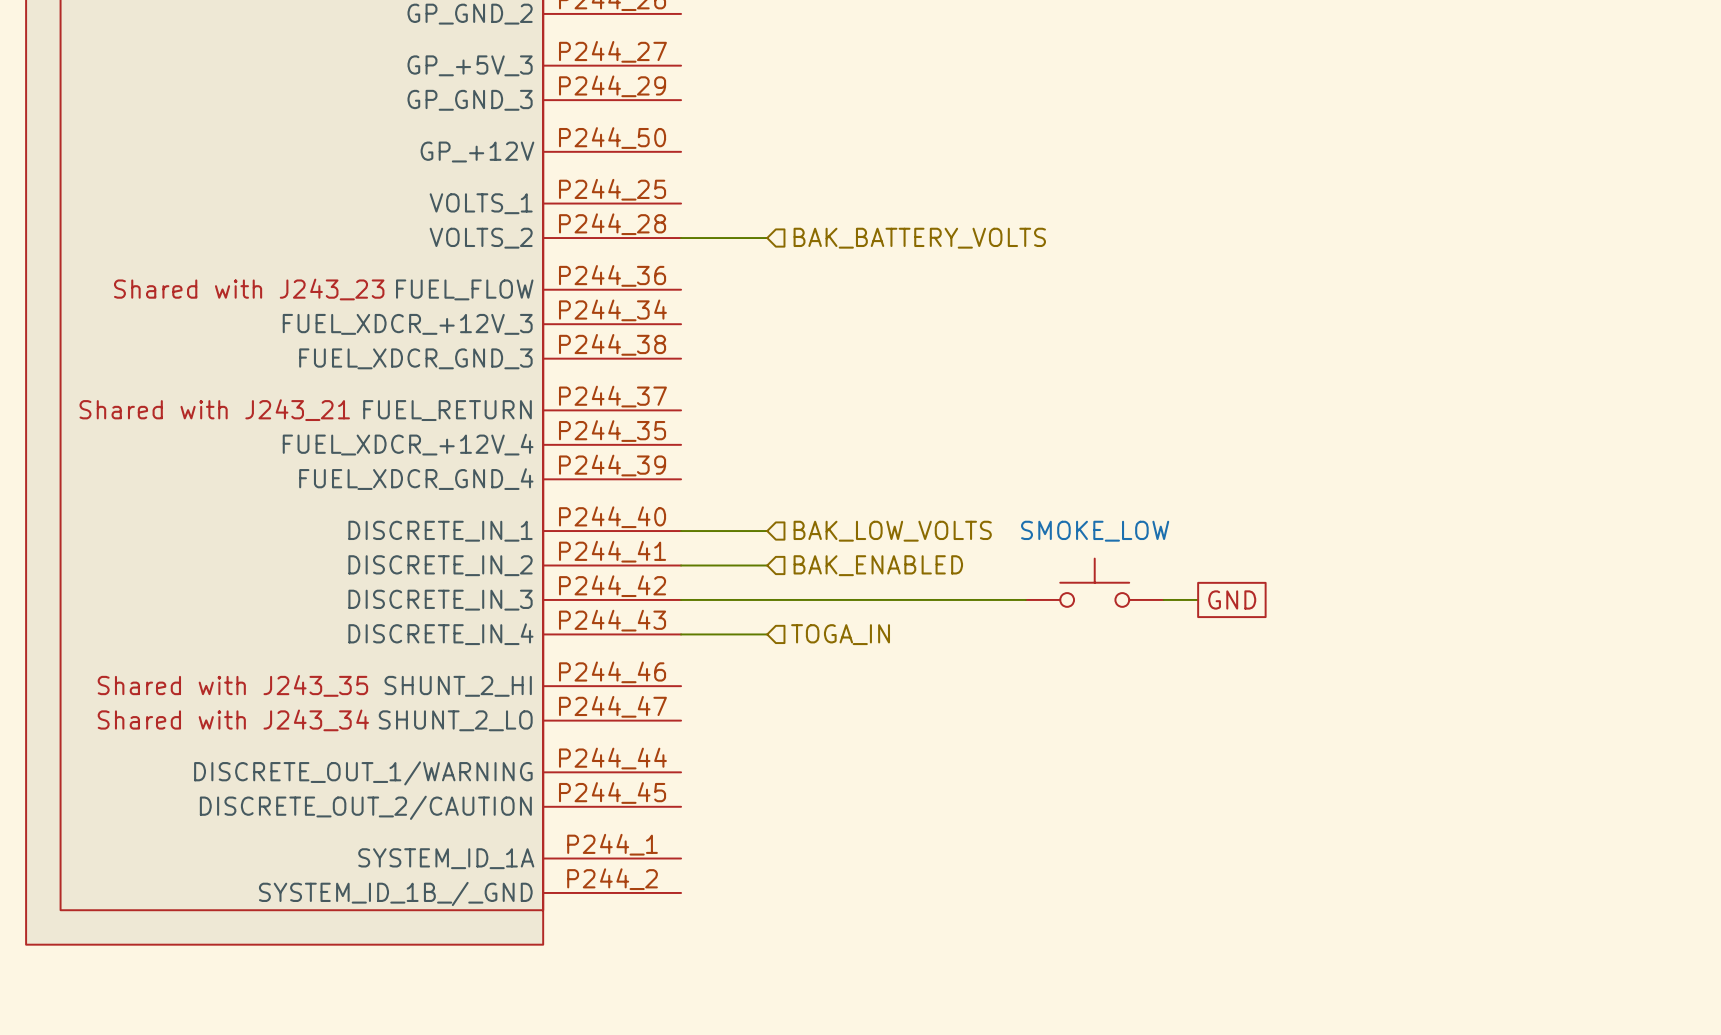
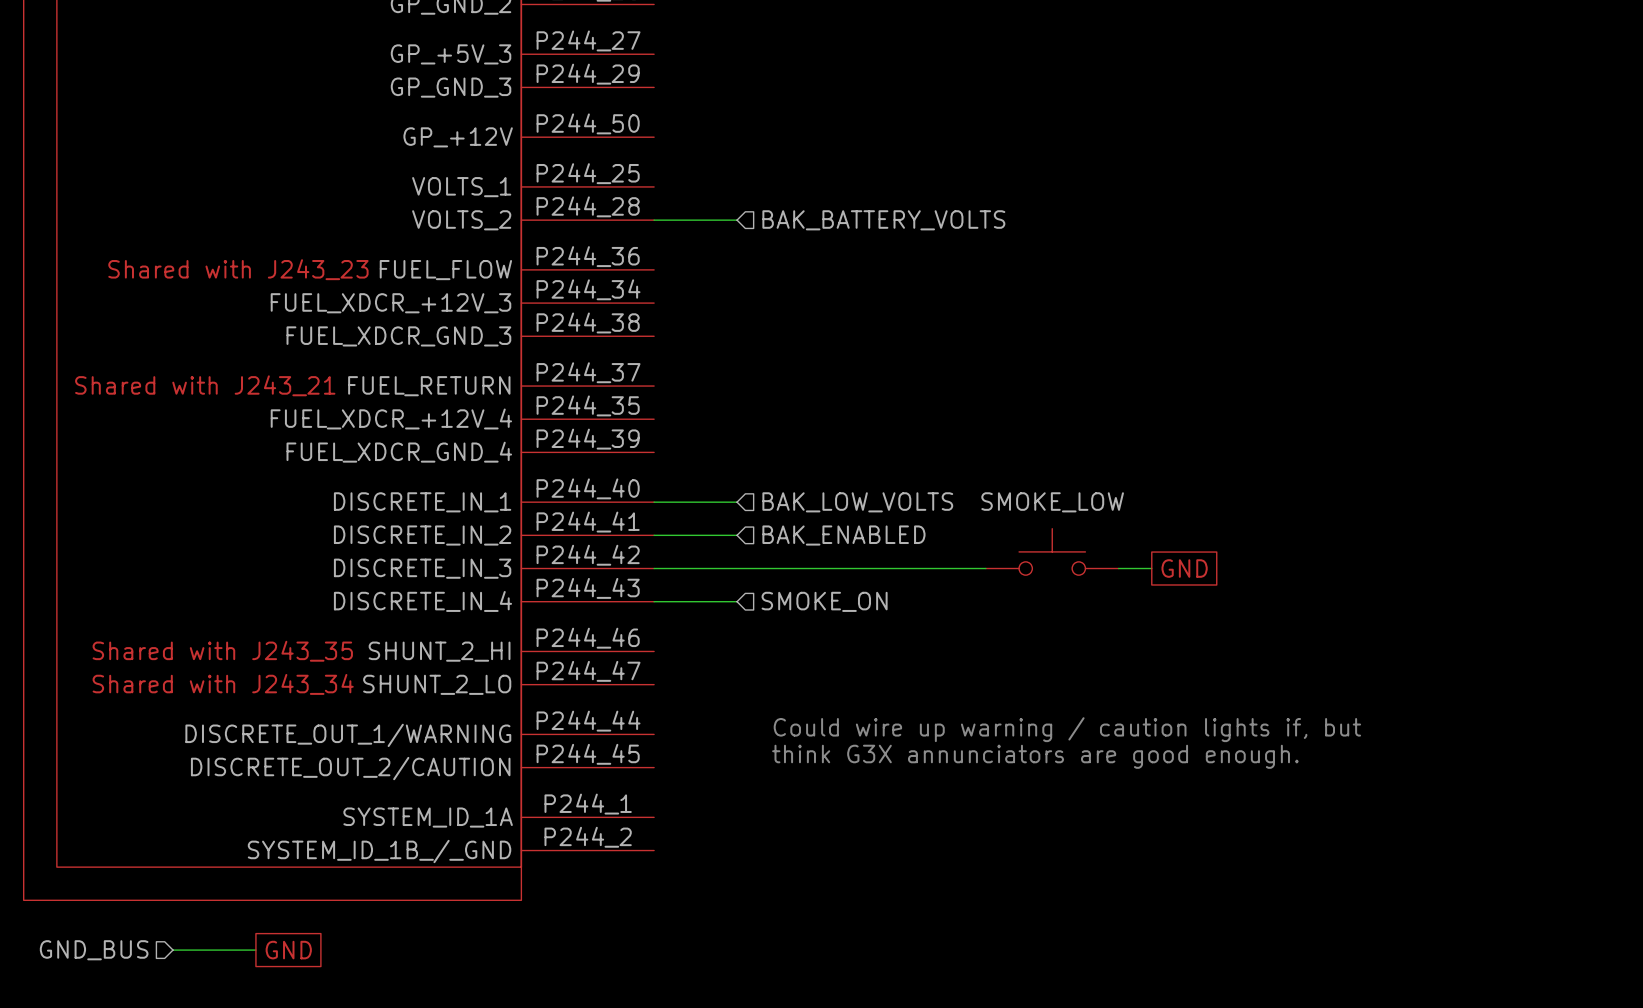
hierarchical label: TOGA_IN (840, 634) -> SMOKE_ON (824, 601)
text: none -> Could wire up warning / caution lights if, but (1067, 729)
text: none -> think G3X annunciators are good enough. (1035, 756)
hierarchical label: none -> GND_BUS (94, 950)
wire: none -> (173, 950) (255, 950)
global label: none -> GND (288, 950)

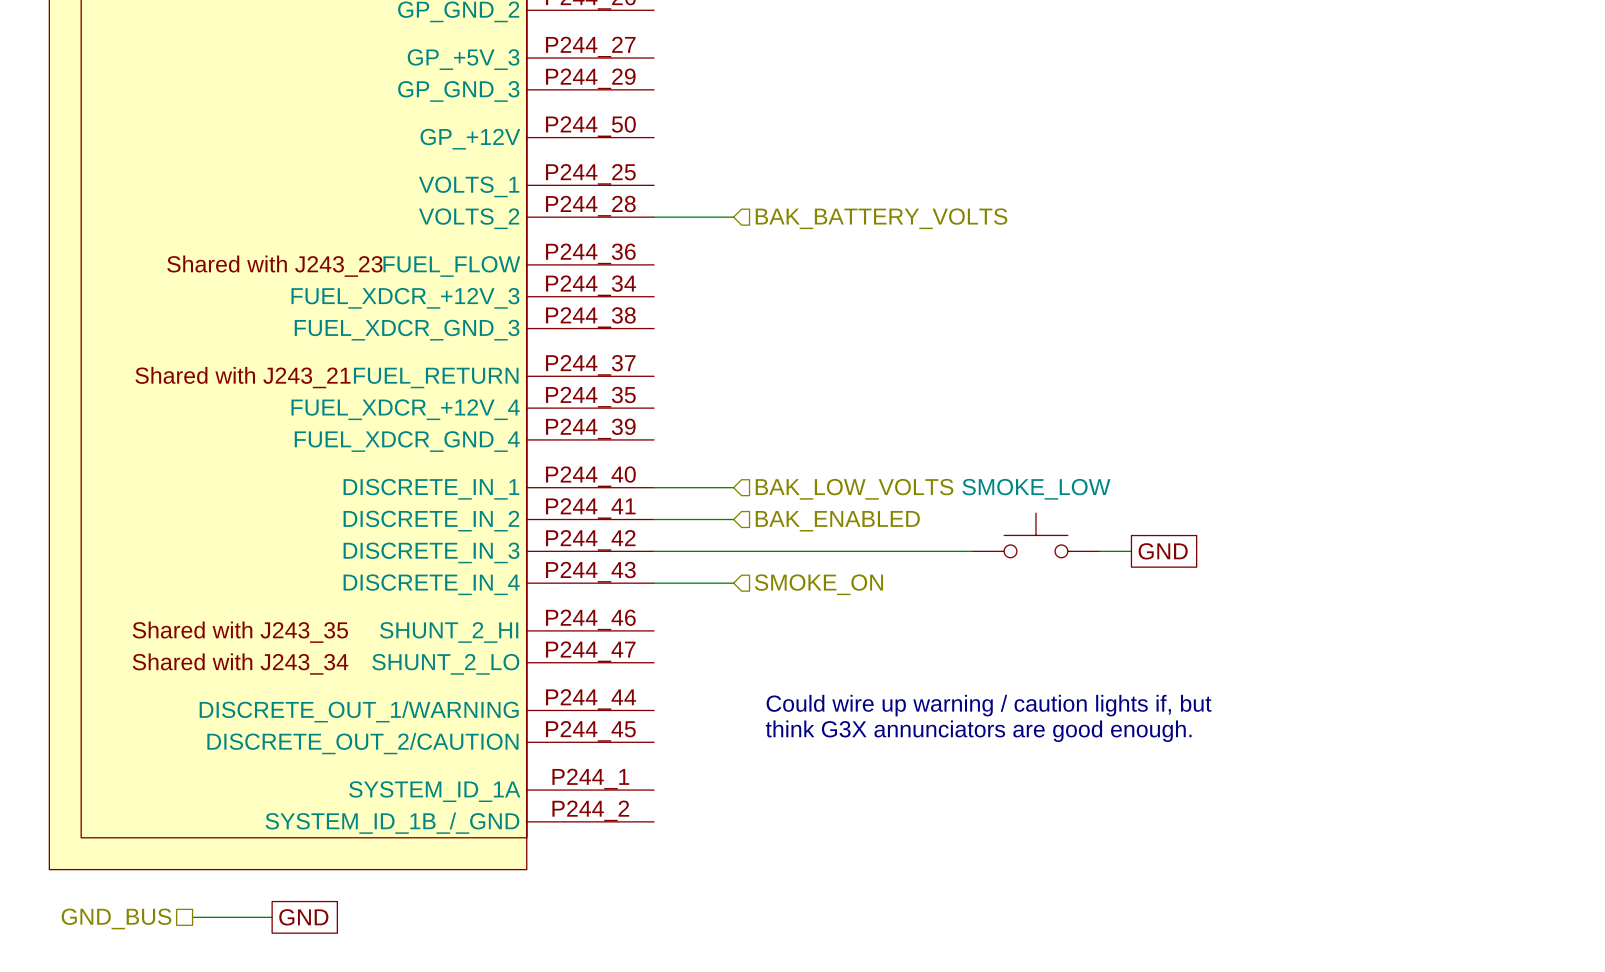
hierarchical label shape: input (94, 950) -> passive (116, 918)

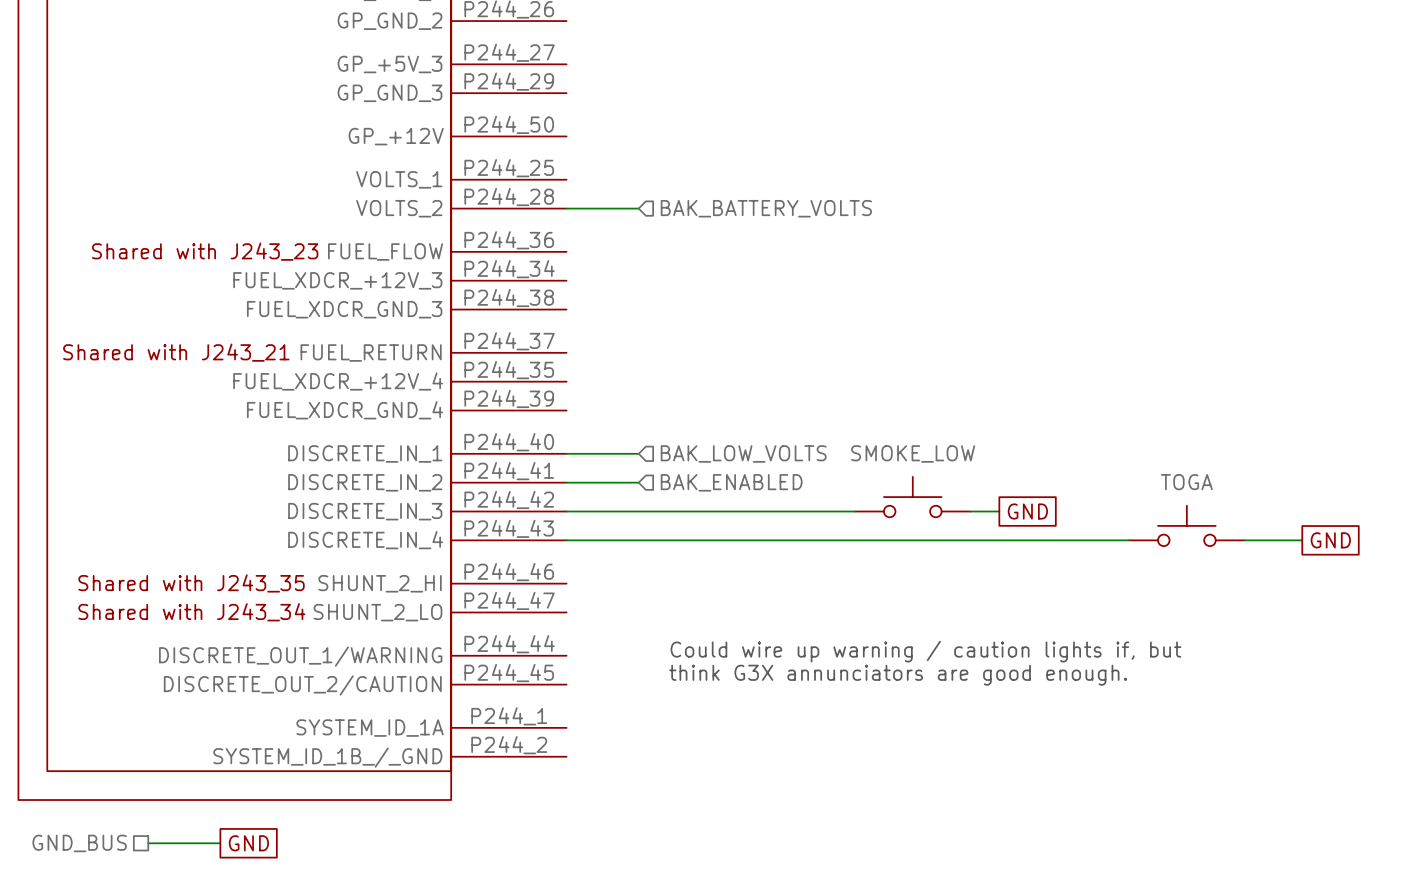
TOGA: none -> (1186, 525)
wire: none -> (638, 540) (1129, 540)
wire: none -> (1244, 540) (1302, 540)
global label: none -> GND (1330, 540)
hierarchical label: SMOKE_ON (818, 584) -> none

